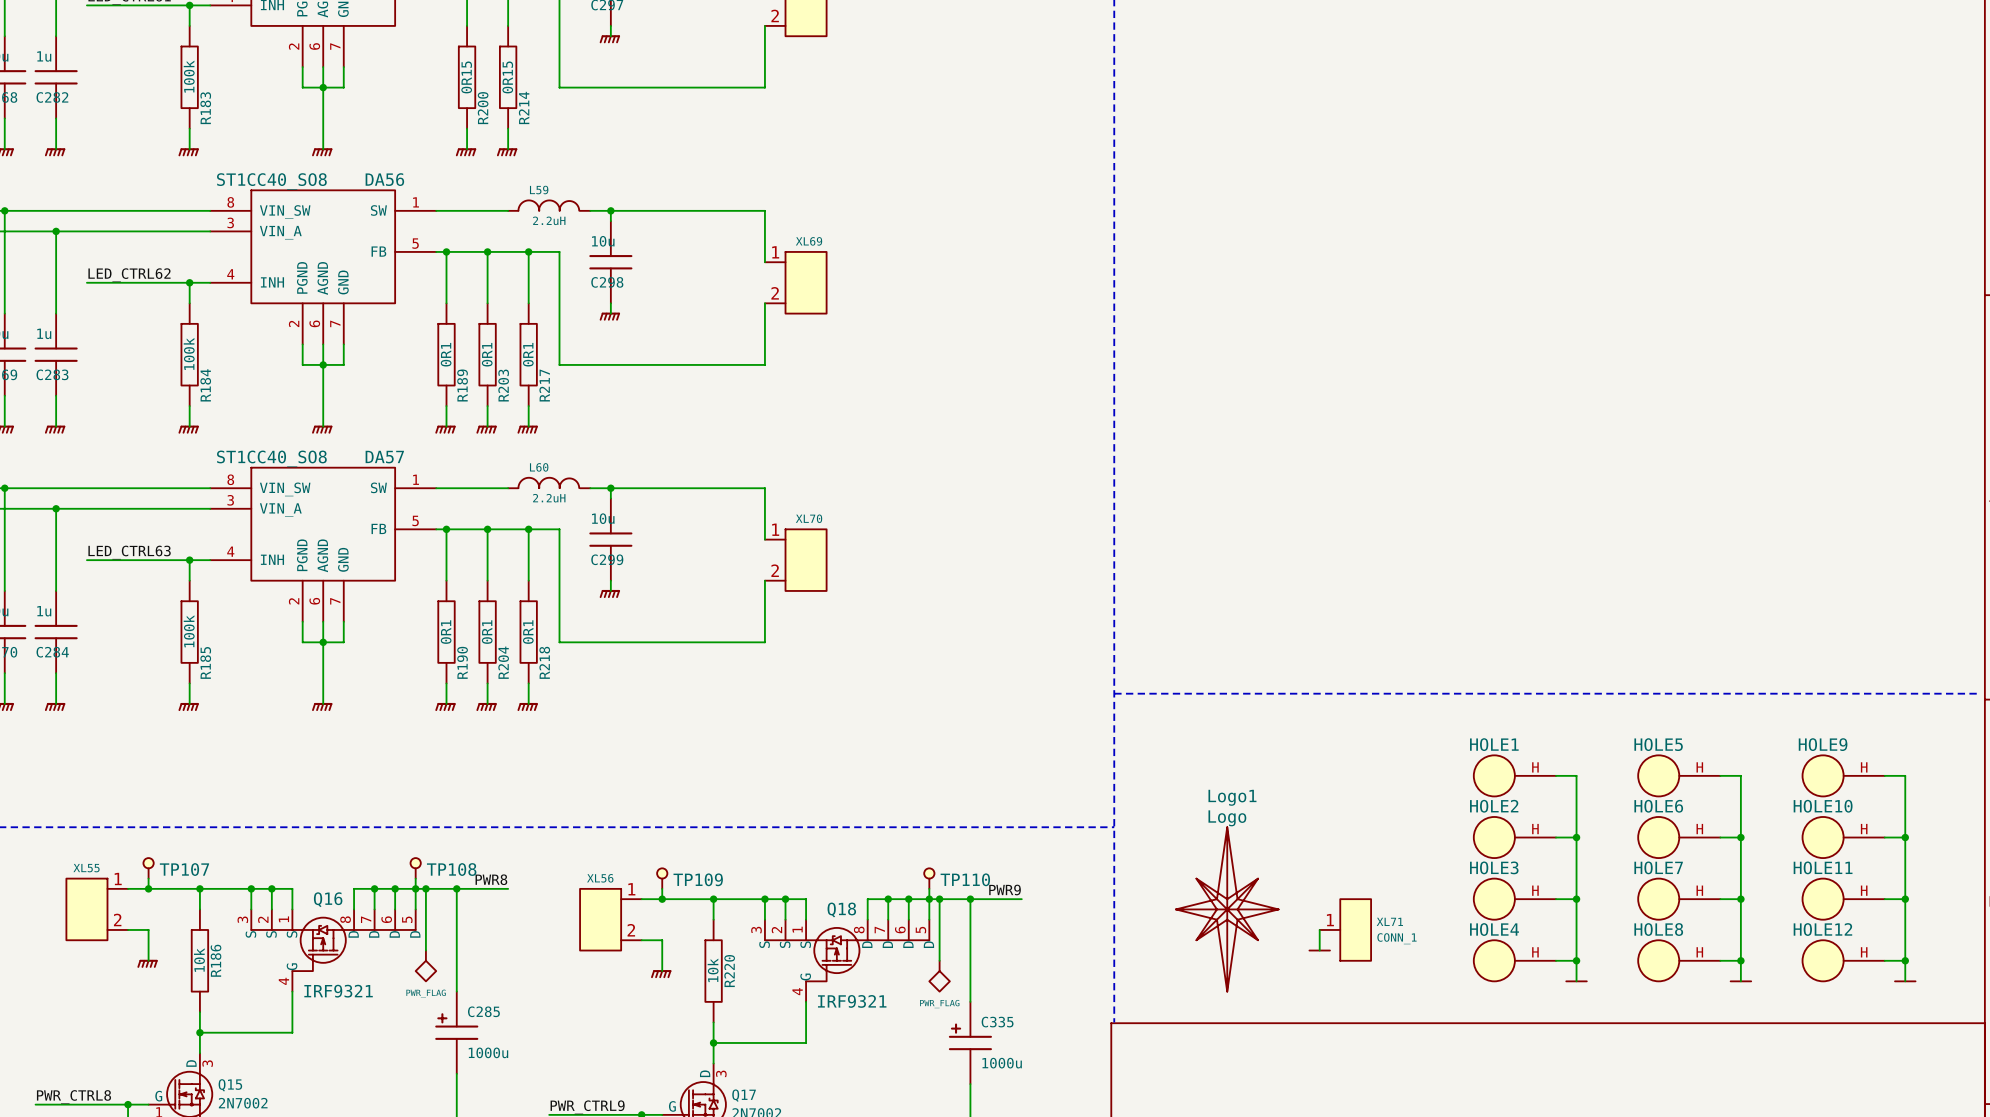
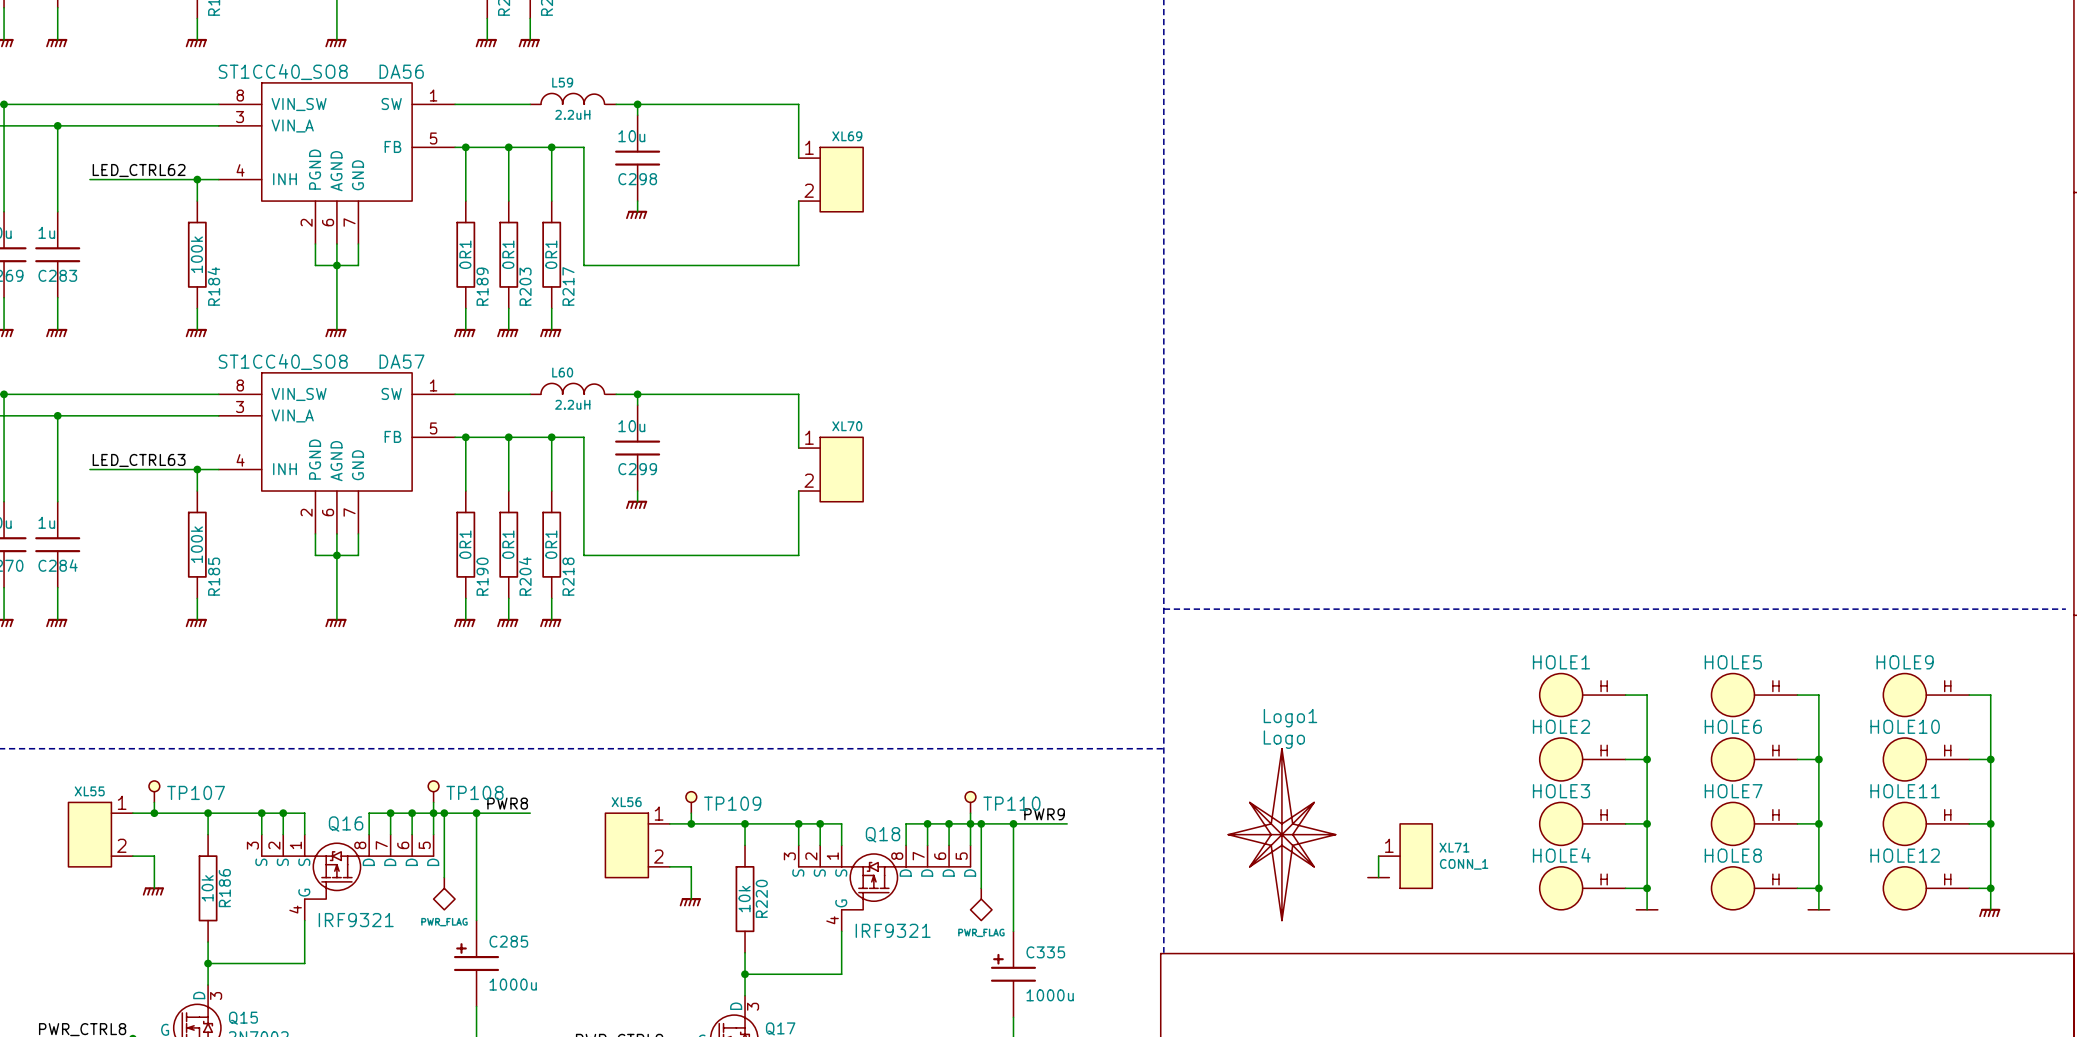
power symbol shape: [1894, 980, 1917, 982] -> [1979, 908, 2001, 918]

